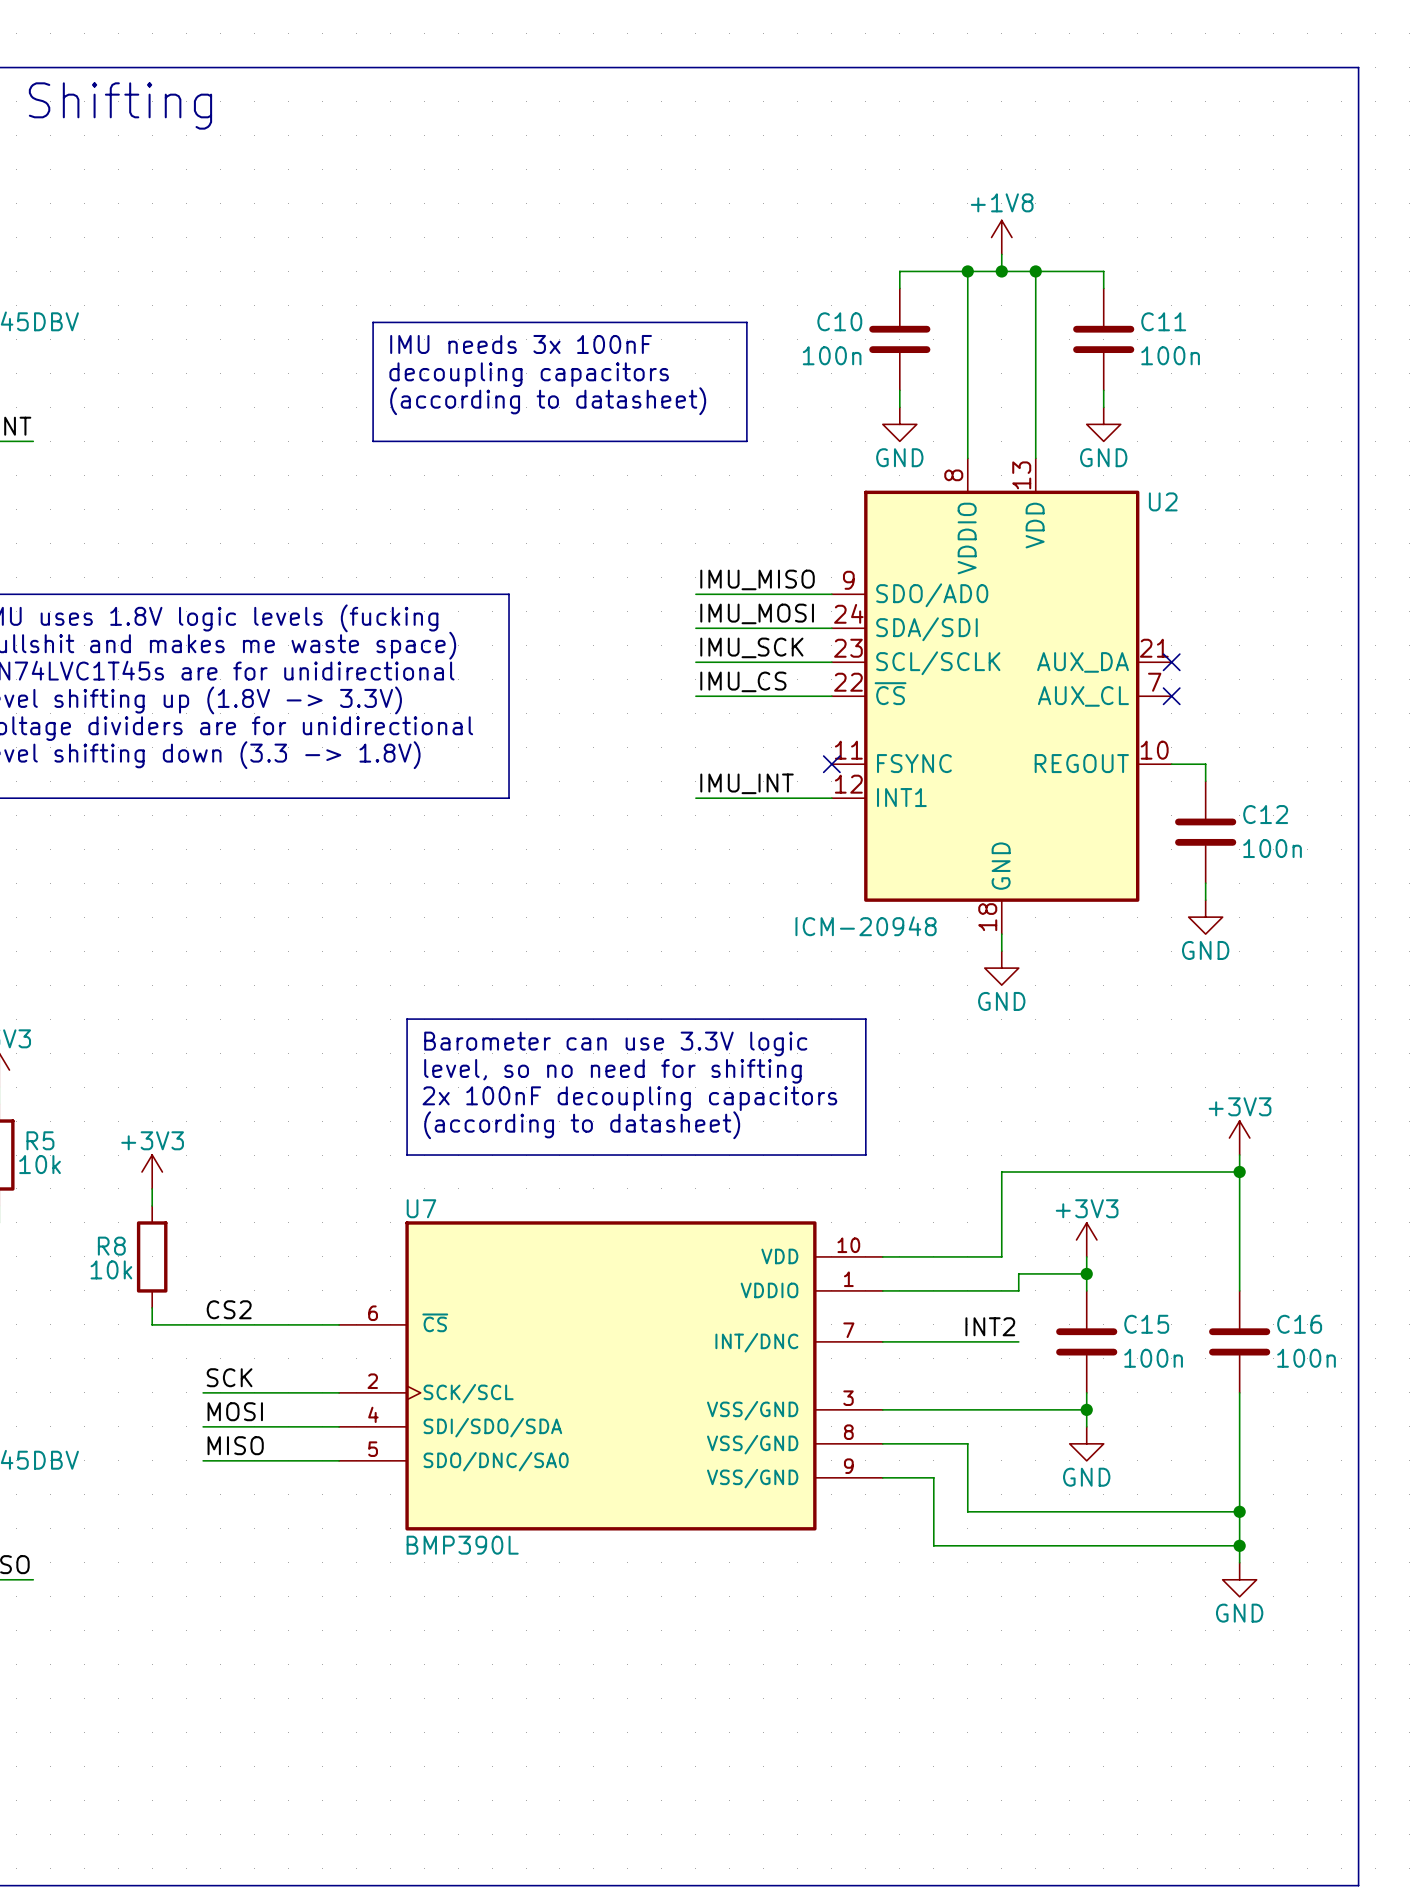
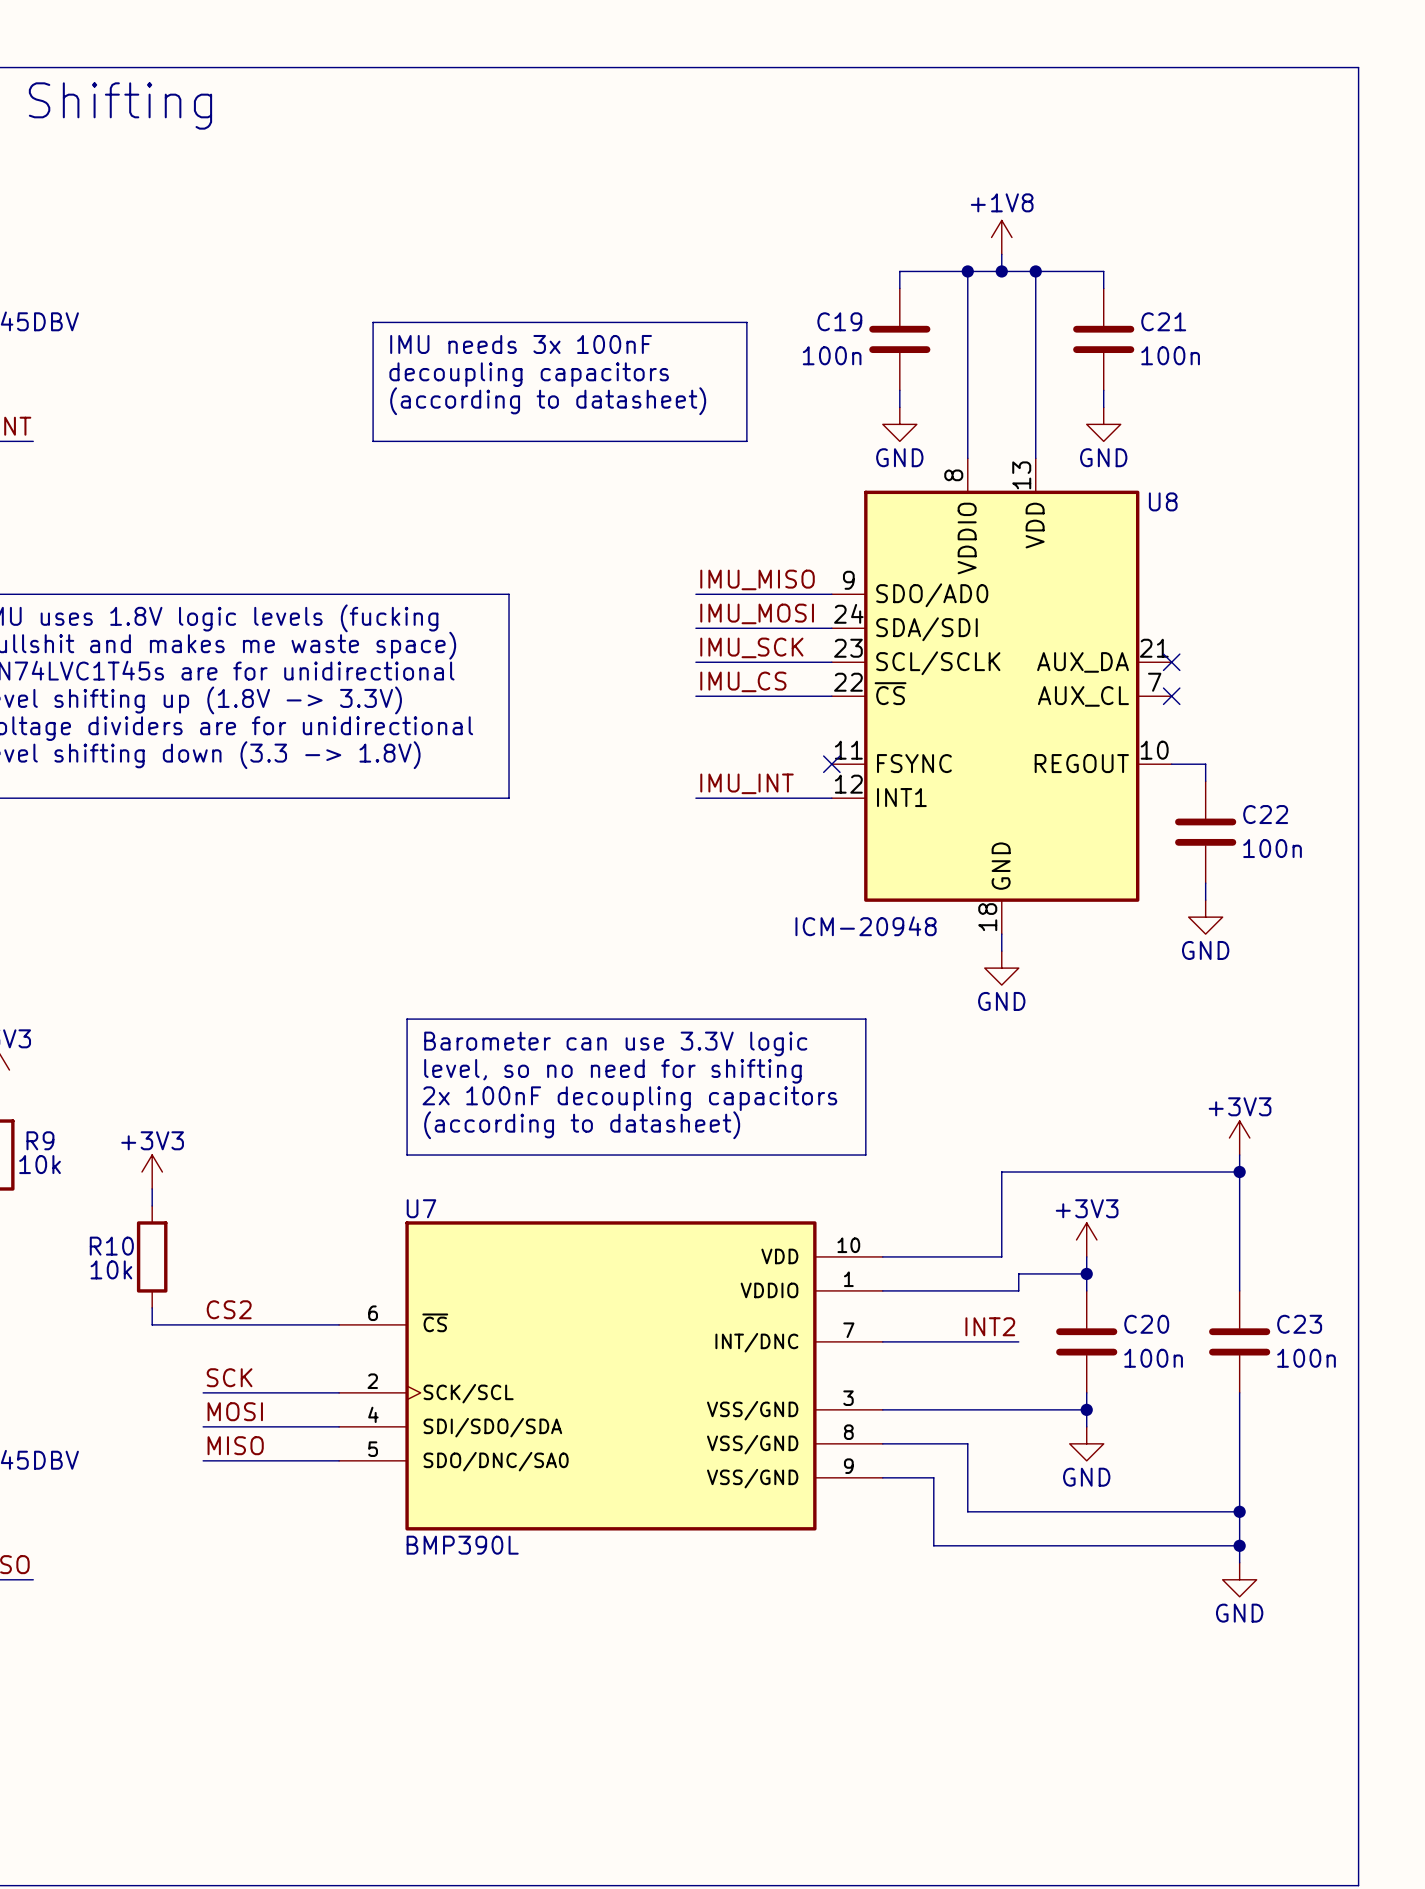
C10 name: C10 (839, 321) -> C19 (839, 321)
C11 name: C11 (1163, 321) -> C21 (1163, 321)
U2 name: U2 (1163, 501) -> U8 (1163, 501)
C12 name: C12 (1265, 814) -> C22 (1265, 814)
R5 name: R5 (40, 1140) -> R9 (40, 1140)
R8 name: R8 (111, 1246) -> R10 (111, 1246)
C15 name: C15 (1146, 1324) -> C20 (1146, 1324)
C16 name: C16 (1299, 1324) -> C23 (1299, 1324)

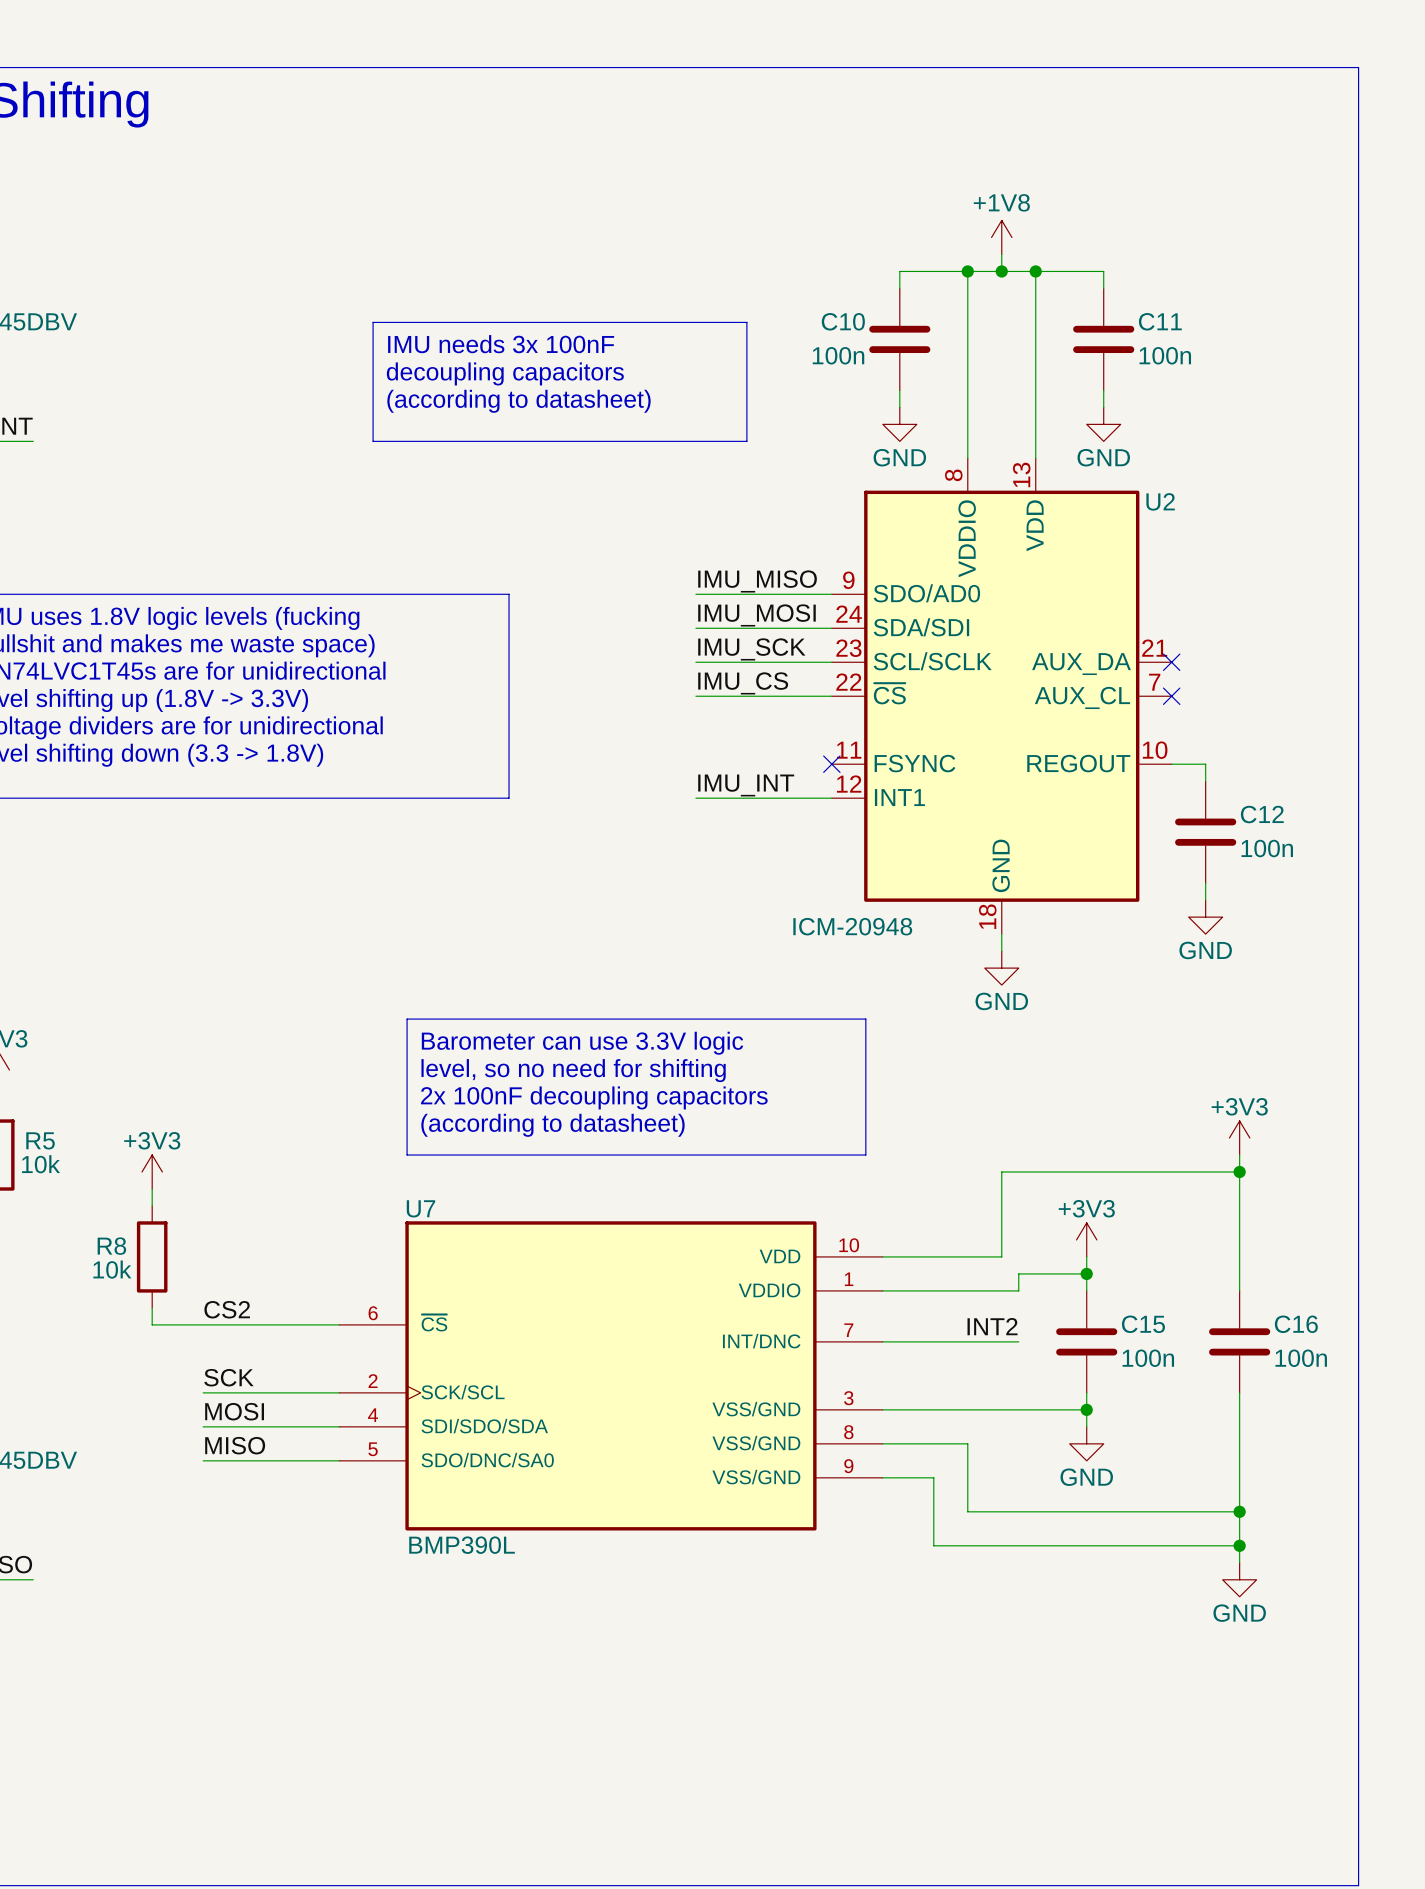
C19 name: C19 (839, 321) -> C10 (843, 321)
C21 name: C21 (1163, 321) -> C11 (1160, 321)
U8 name: U8 (1163, 501) -> U2 (1160, 501)
C22 name: C22 (1265, 814) -> C12 (1262, 814)
R9 name: R9 (40, 1140) -> R5 (40, 1140)
R10 name: R10 (111, 1246) -> R8 (111, 1246)
C20 name: C20 (1146, 1324) -> C15 (1143, 1324)
C23 name: C23 (1299, 1324) -> C16 (1296, 1324)

